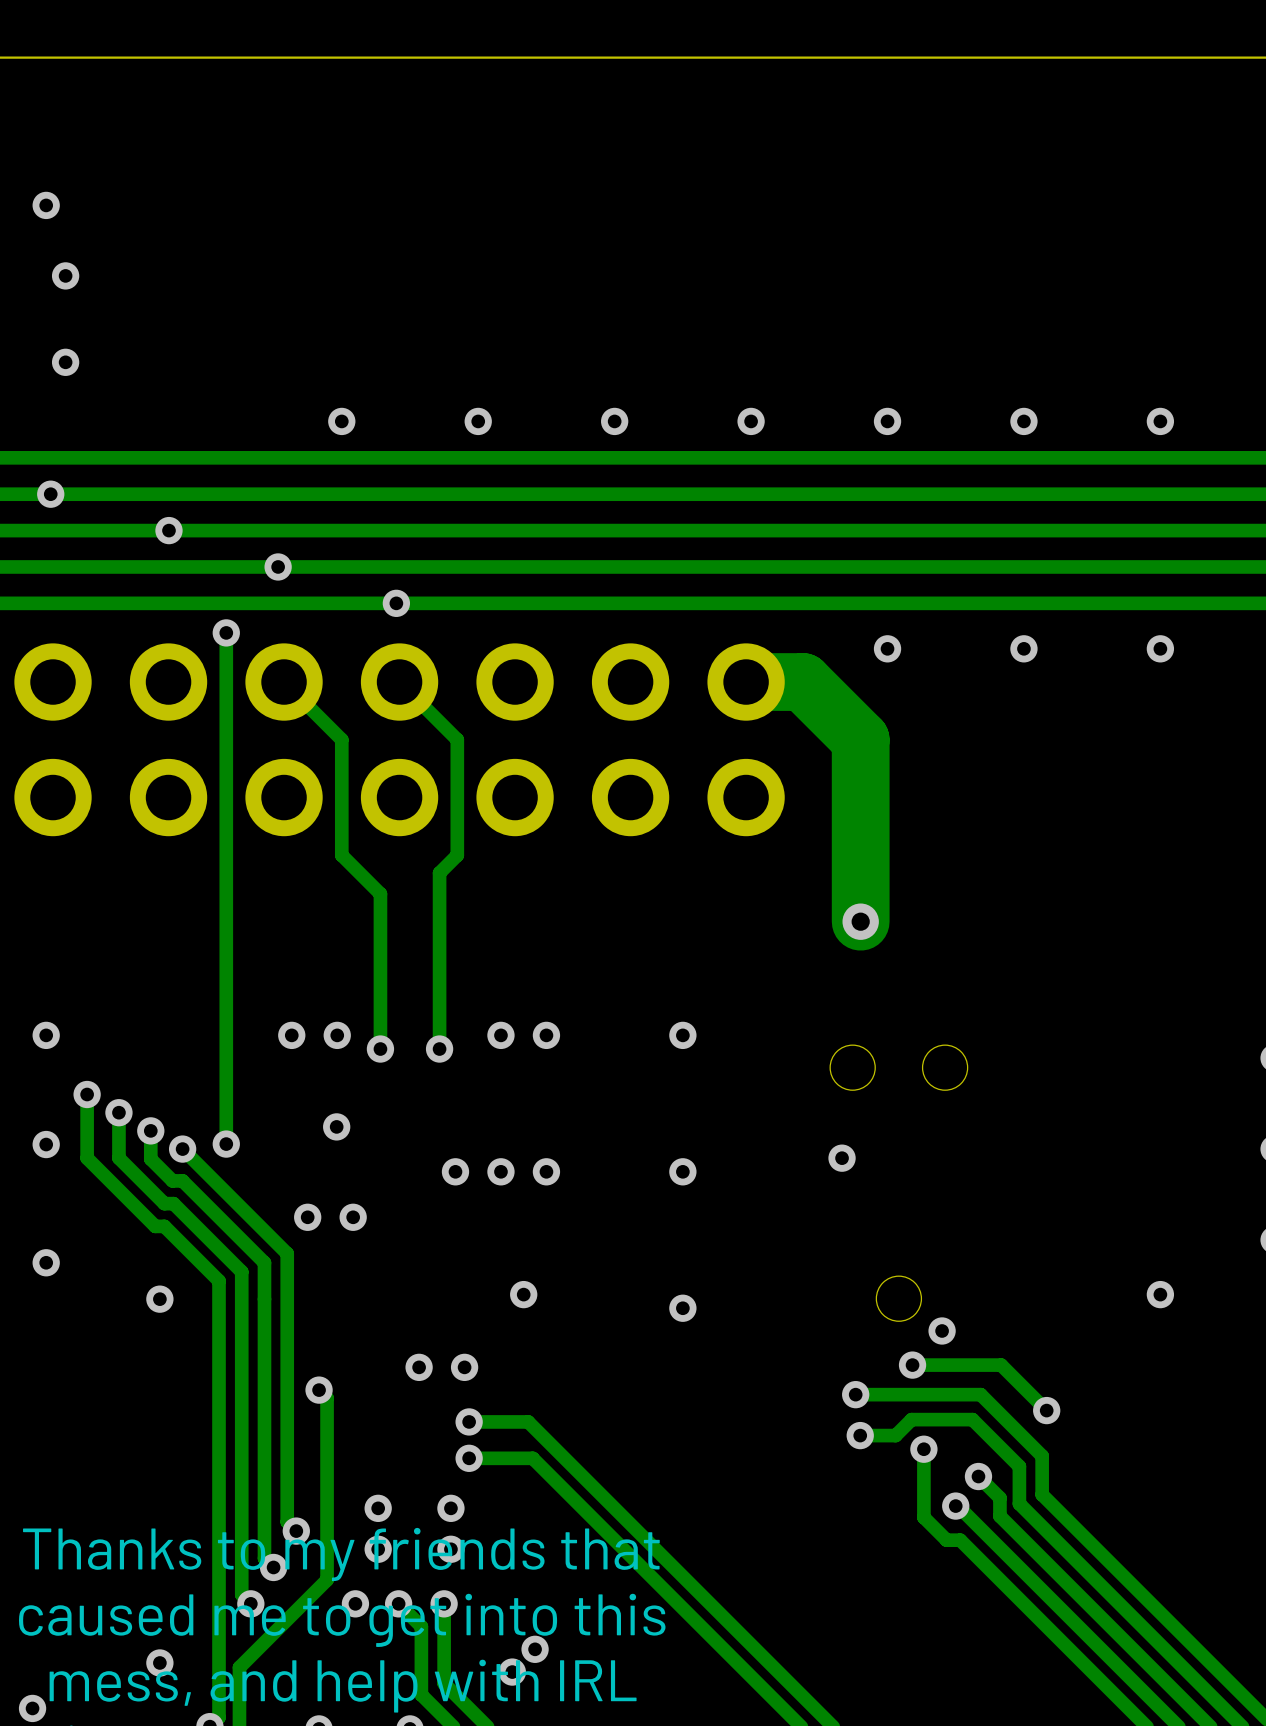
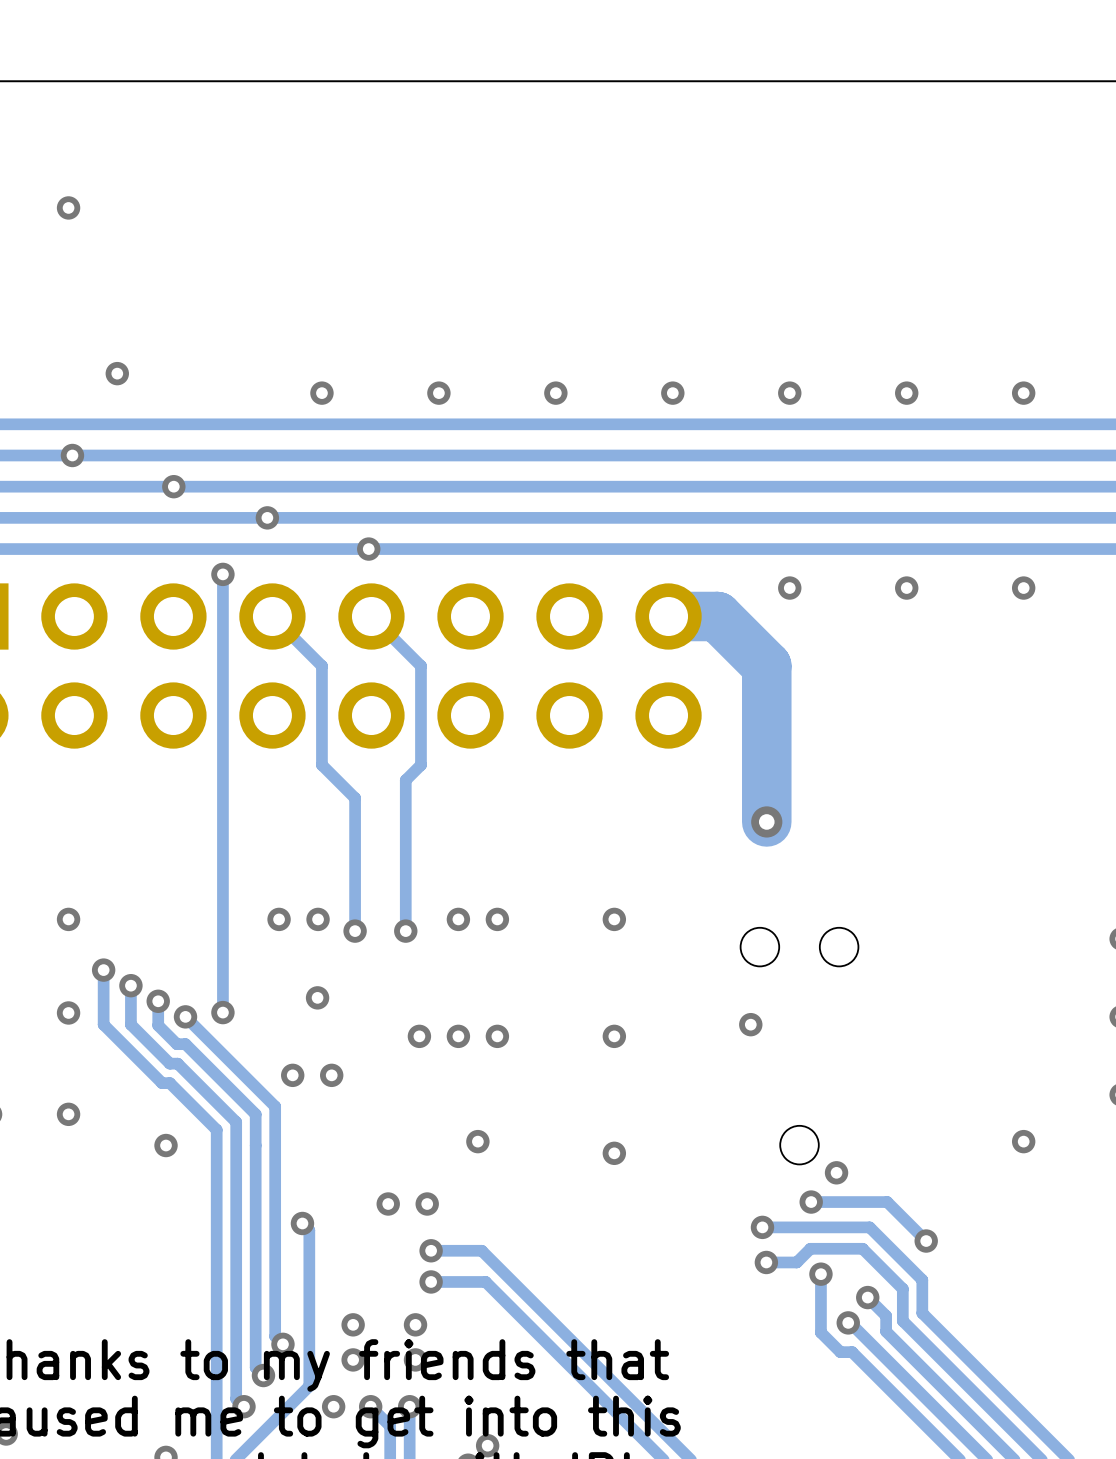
via: (65, 275) -> none
via position: (65, 362) -> (117, 373)

